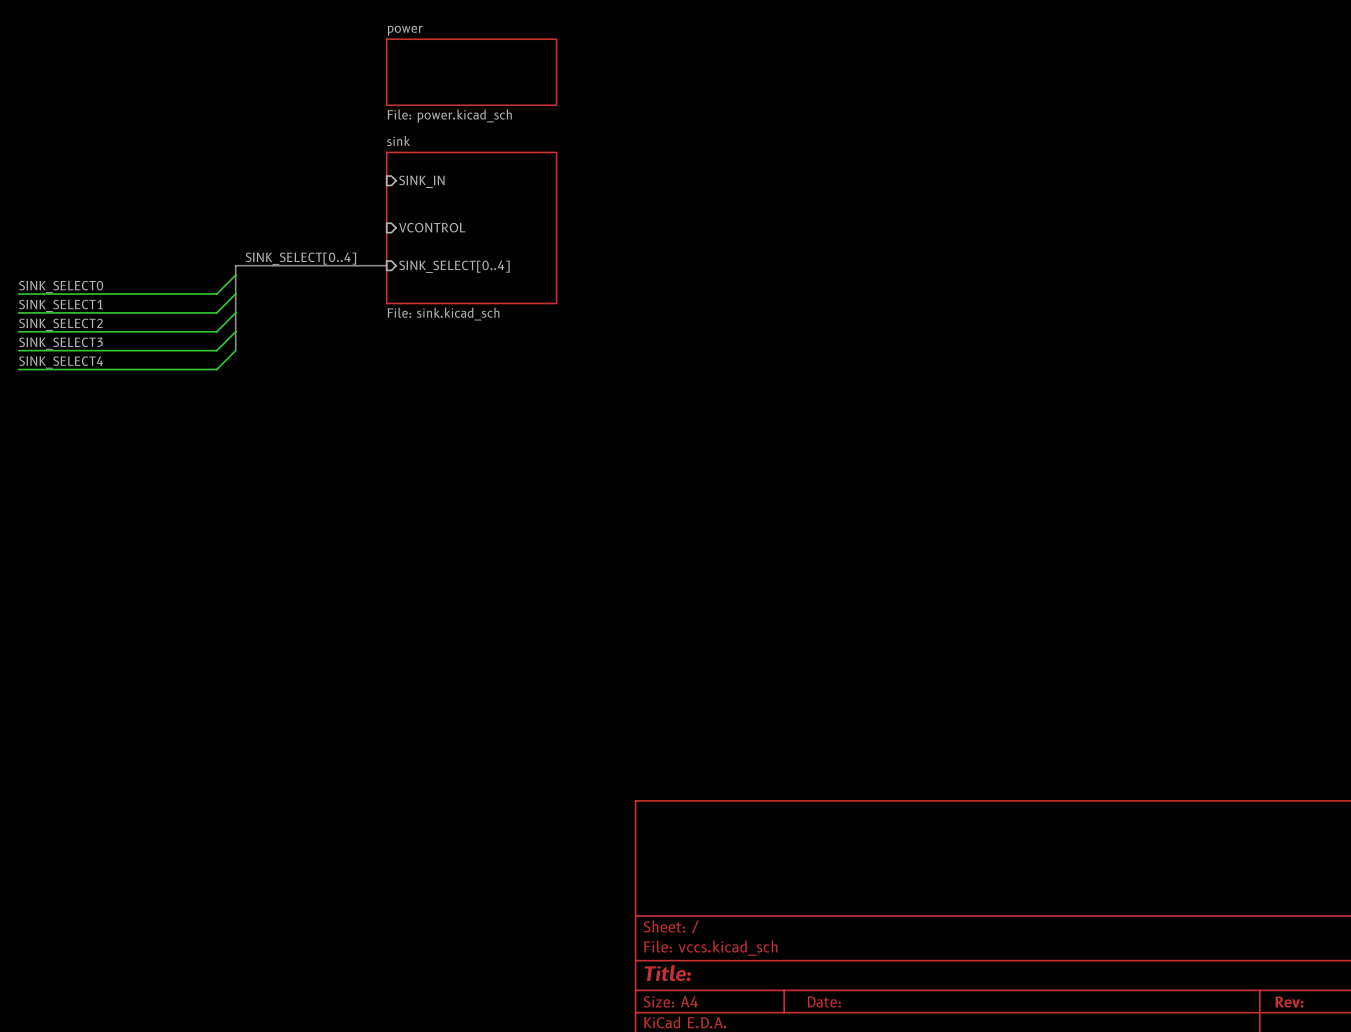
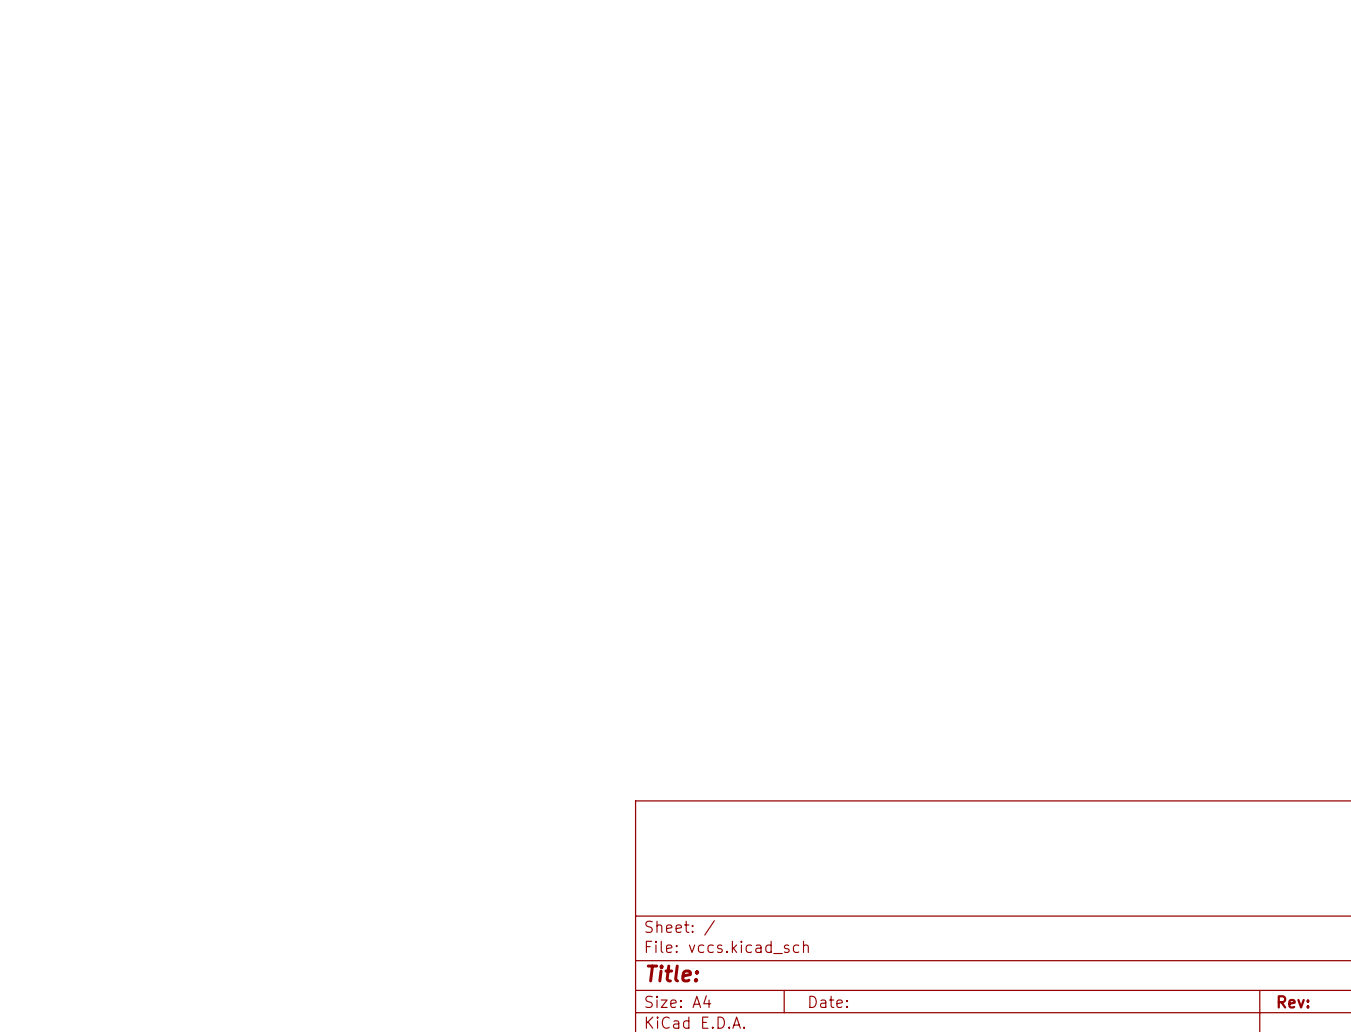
sheet power: File: power.kicad_sch (471, 72) -> none
sheet pin: SINK_IN (421, 181) -> none
sheet pin: VCONTROL (432, 227) -> none
sheet sink: File: sink.kicad_sch (471, 227) -> none
label: SINK_SELECT[0..4] (300, 258) -> none
bus: (386, 265) (235, 265) (235, 350) -> none
sheet pin: SINK_SELECT[0..4] (454, 266) -> none
wire: (235, 275) (216, 294) (18, 294) -> none
label: SINK_SELECT0 (61, 287) -> none
wire: (235, 294) (216, 312) (18, 312) -> none
label: SINK_SELECT1 (60, 305) -> none
wire: (235, 312) (216, 331) (18, 331) -> none
label: SINK_SELECT2 (60, 324) -> none
wire: (235, 331) (216, 350) (18, 350) -> none
label: SINK_SELECT3 (60, 343) -> none
wire: (235, 350) (216, 369) (18, 369) -> none
label: SINK_SELECT4 (61, 362) -> none

